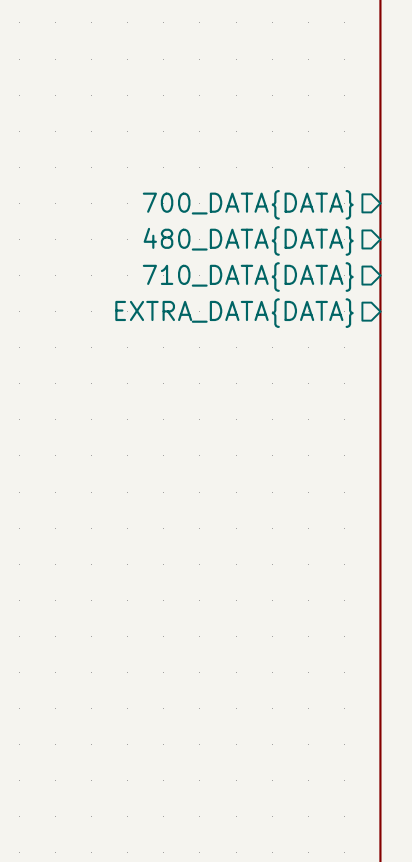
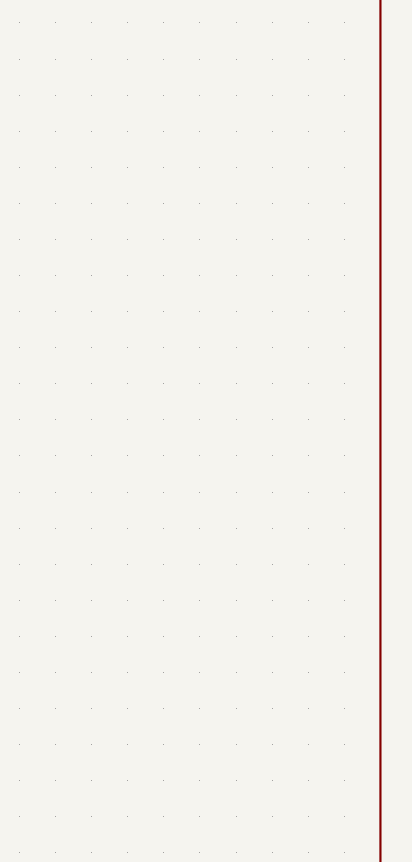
sheet pin: 700_DATA{DATA} (248, 204) -> none
sheet pin: 480_DATA{DATA} (248, 240) -> none
sheet pin: 710_DATA{DATA} (248, 277) -> none
sheet pin: EXTRA_DATA{DATA} (234, 313) -> none

